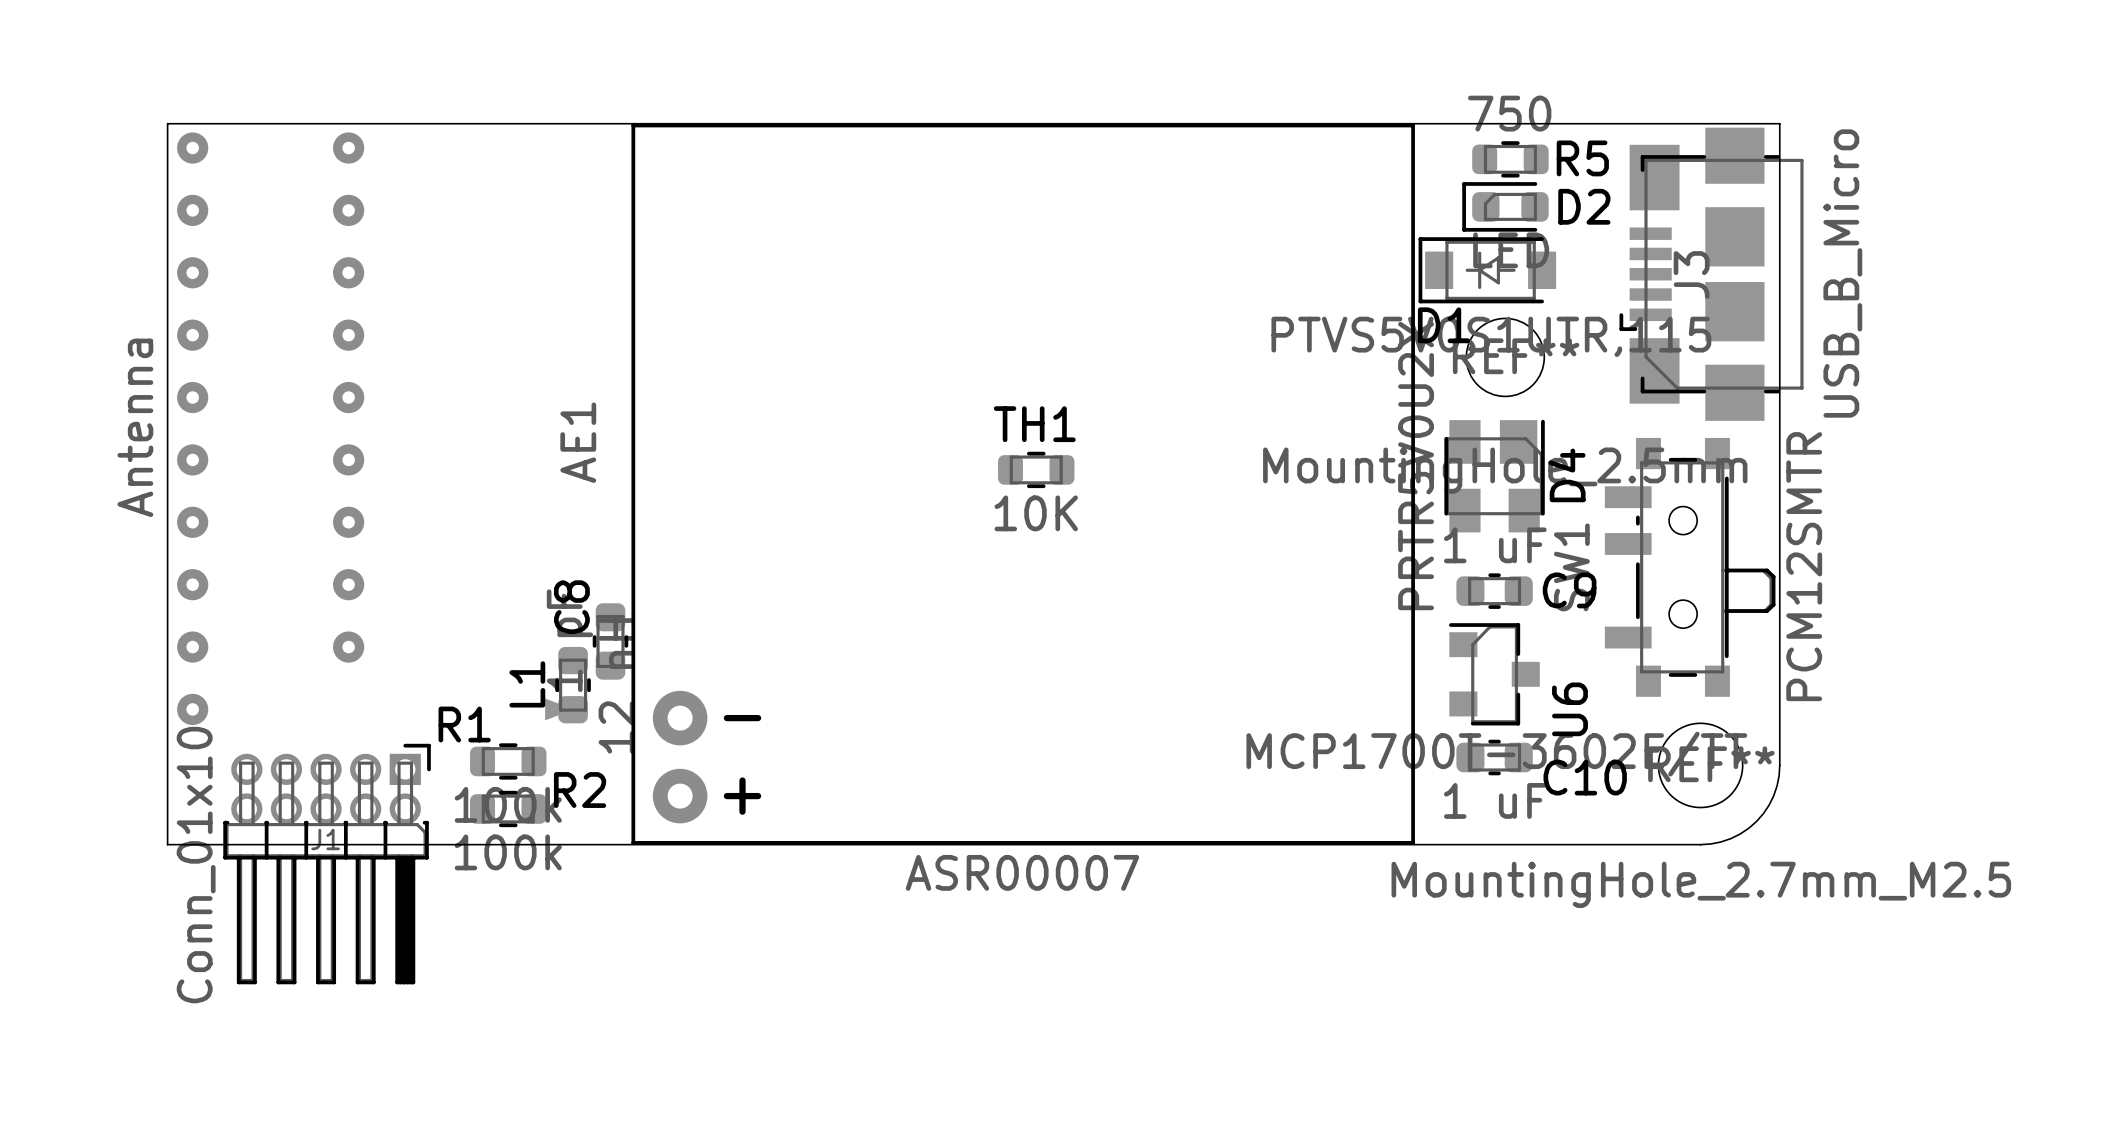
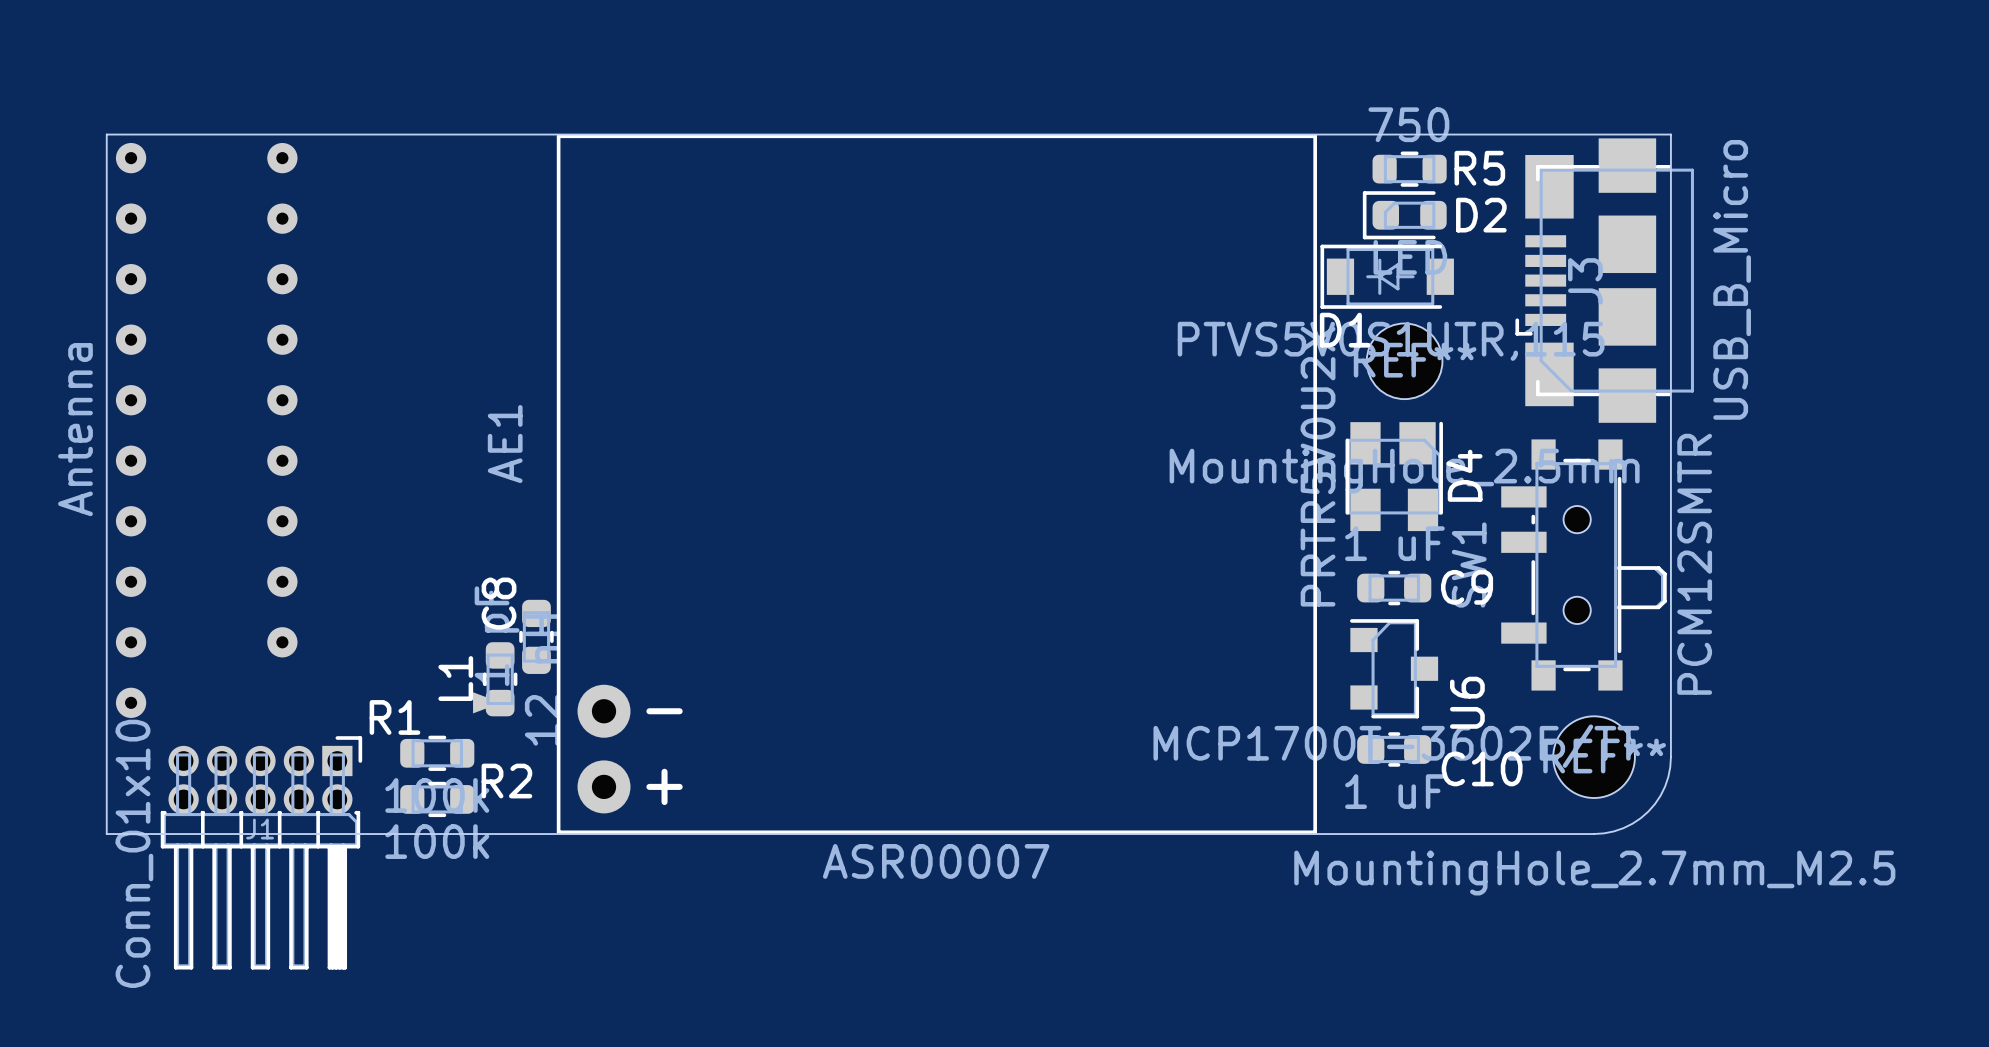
TH1: 10K (1036, 469) -> none

